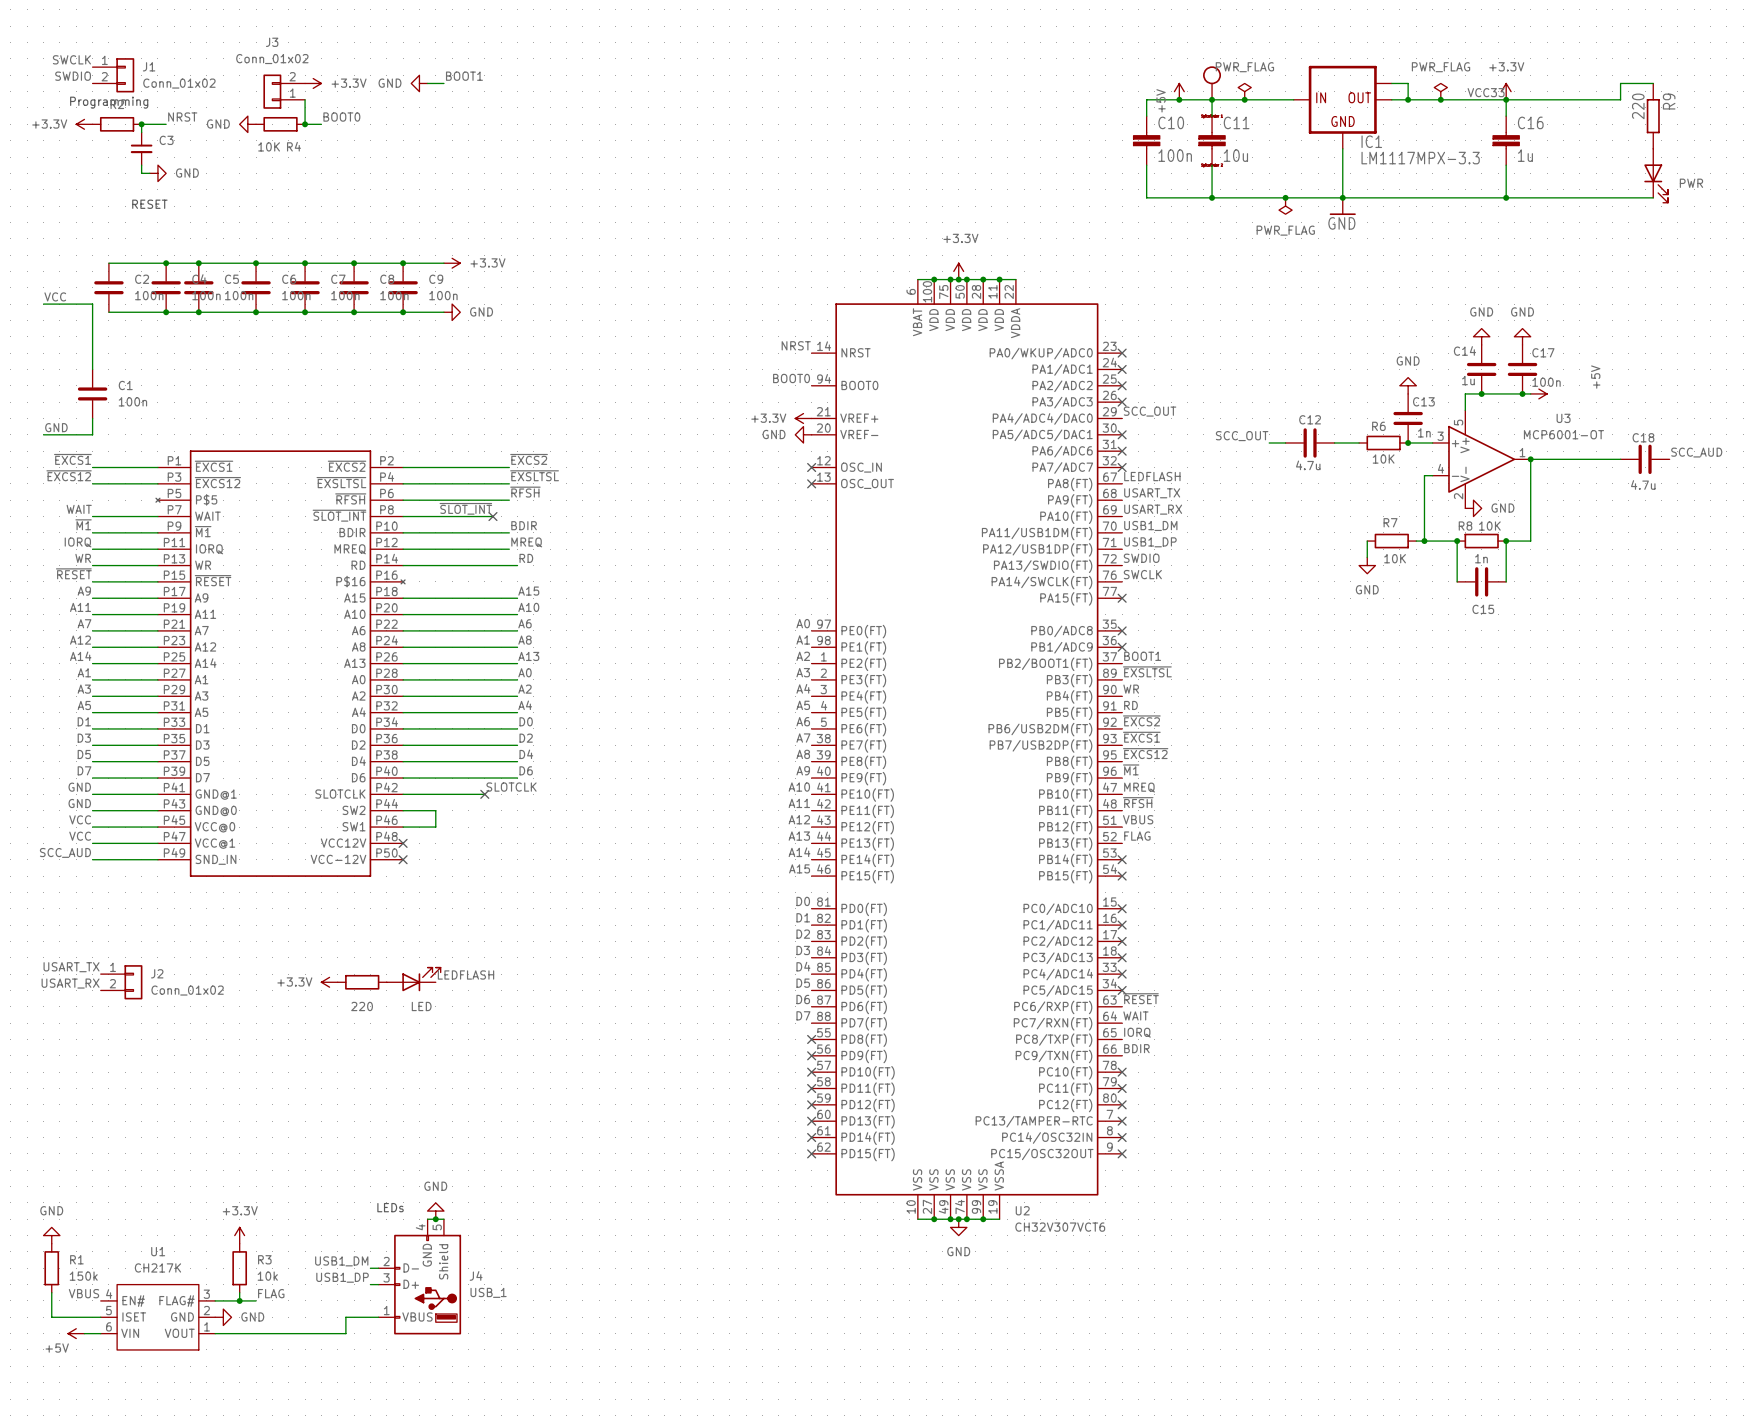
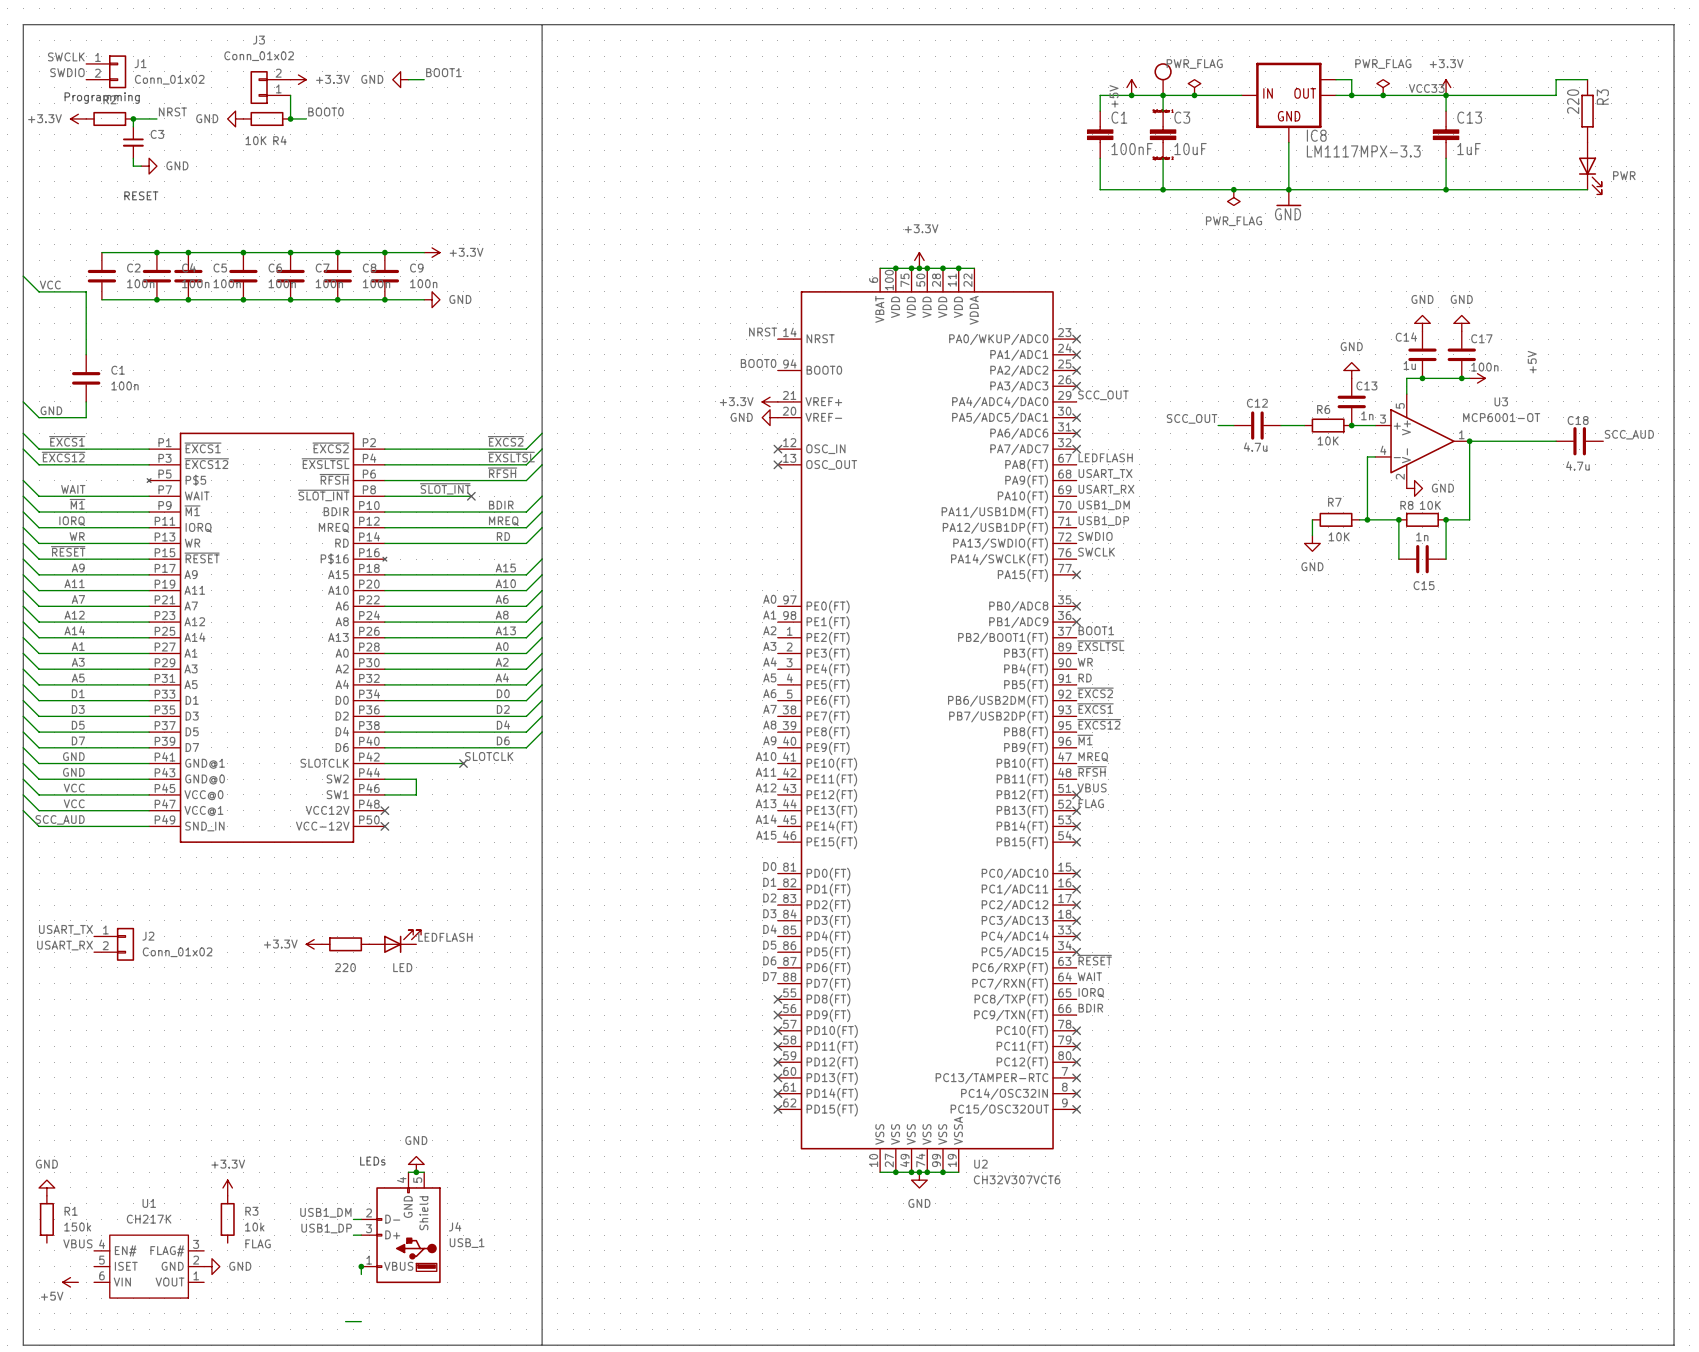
bus: none -> (23, 24) (23, 1345) (1674, 1345) (1674, 24) (23, 24)
bus: none -> (542, 24) (542, 1345)
R9 name: R9 (1669, 101) -> R3 (1602, 97)
C10 name: C10 (1171, 122) -> C1 (1119, 117)
C11 name: C11 (1236, 122) -> C3 (1182, 117)
C16 name: C16 (1530, 122) -> C13 (1469, 117)
IC1 name: IC1 (1371, 141) -> IC8 (1316, 135)
C10 value: 100n (1175, 155) -> 100nF (1132, 149)
C11 value: 10u (1235, 155) -> 10uF (1190, 149)
C16 value: 1u (1525, 155) -> 1uF (1469, 149)
wire: none -> (23, 276) (39, 291)
wire: none -> (23, 401) (39, 417)
wire: none -> (23, 433) (39, 449) (86, 449)
wire: none -> (542, 433) (526, 449) (487, 449)
wire: none -> (23, 449) (39, 464) (86, 464)
wire: none -> (542, 449) (526, 464) (487, 464)
wire: none -> (542, 464) (526, 480) (487, 480)
wire: none -> (23, 480) (39, 496) (86, 496)
wire: none -> (23, 496) (39, 512) (86, 512)
wire: none -> (542, 496) (526, 512) (487, 512)
wire: none -> (23, 512) (39, 527) (86, 527)
wire: none -> (542, 512) (526, 527) (487, 527)
wire: none -> (23, 527) (39, 543) (86, 543)
wire: none -> (542, 527) (526, 543) (494, 543)
wire: none -> (23, 543) (39, 559) (86, 559)
wire: none -> (23, 559) (39, 574) (86, 574)
wire: none -> (542, 559) (526, 574) (494, 574)
wire: none -> (23, 574) (39, 590) (86, 590)
wire: none -> (542, 574) (526, 590) (494, 590)
wire: none -> (23, 590) (39, 606) (86, 606)
wire: none -> (542, 590) (526, 606) (494, 606)
wire: none -> (23, 606) (39, 622) (86, 622)
wire: none -> (542, 606) (526, 622) (494, 622)
wire: none -> (23, 622) (39, 637) (86, 637)
wire: none -> (542, 622) (526, 637) (494, 637)
wire: none -> (23, 637) (39, 653) (86, 653)
wire: none -> (542, 637) (526, 653) (494, 653)
wire: none -> (23, 653) (39, 669) (86, 669)
wire: none -> (542, 653) (526, 669) (494, 669)
wire: none -> (23, 669) (39, 684) (86, 684)
wire: none -> (542, 669) (526, 684) (494, 684)
wire: none -> (23, 684) (39, 700) (86, 700)
wire: none -> (542, 684) (526, 700) (494, 700)
wire: none -> (23, 700) (39, 716) (86, 716)
wire: none -> (542, 700) (526, 716) (494, 716)
wire: none -> (23, 716) (39, 732) (86, 732)
wire: none -> (542, 716) (526, 732) (494, 732)
wire: none -> (23, 732) (39, 747) (86, 747)
wire: none -> (542, 732) (526, 747) (494, 747)
wire: none -> (23, 747) (39, 763) (86, 763)
wire: none -> (23, 763) (39, 779) (86, 779)
wire: none -> (23, 779) (39, 794) (86, 794)
wire: none -> (23, 794) (39, 810) (86, 810)
no-connect mark: none -> (1076, 794)
wire: none -> (23, 810) (39, 826) (86, 826)
no-connect mark: none -> (1076, 810)
wire: (51, 1292) (51, 1317) (100, 1317) -> none
wire: (239, 1292) (239, 1300) -> none
wire: (215, 1300) (256, 1300) -> none
junction: (239, 1300) -> none
wire: (378, 1317) (345, 1317) (345, 1333) (215, 1333) -> (361, 1266) (361, 1274)
junction: none -> (361, 1266)
wire: (84, 1333) (100, 1333) -> none
wire: none -> (345, 1321) (361, 1321)

